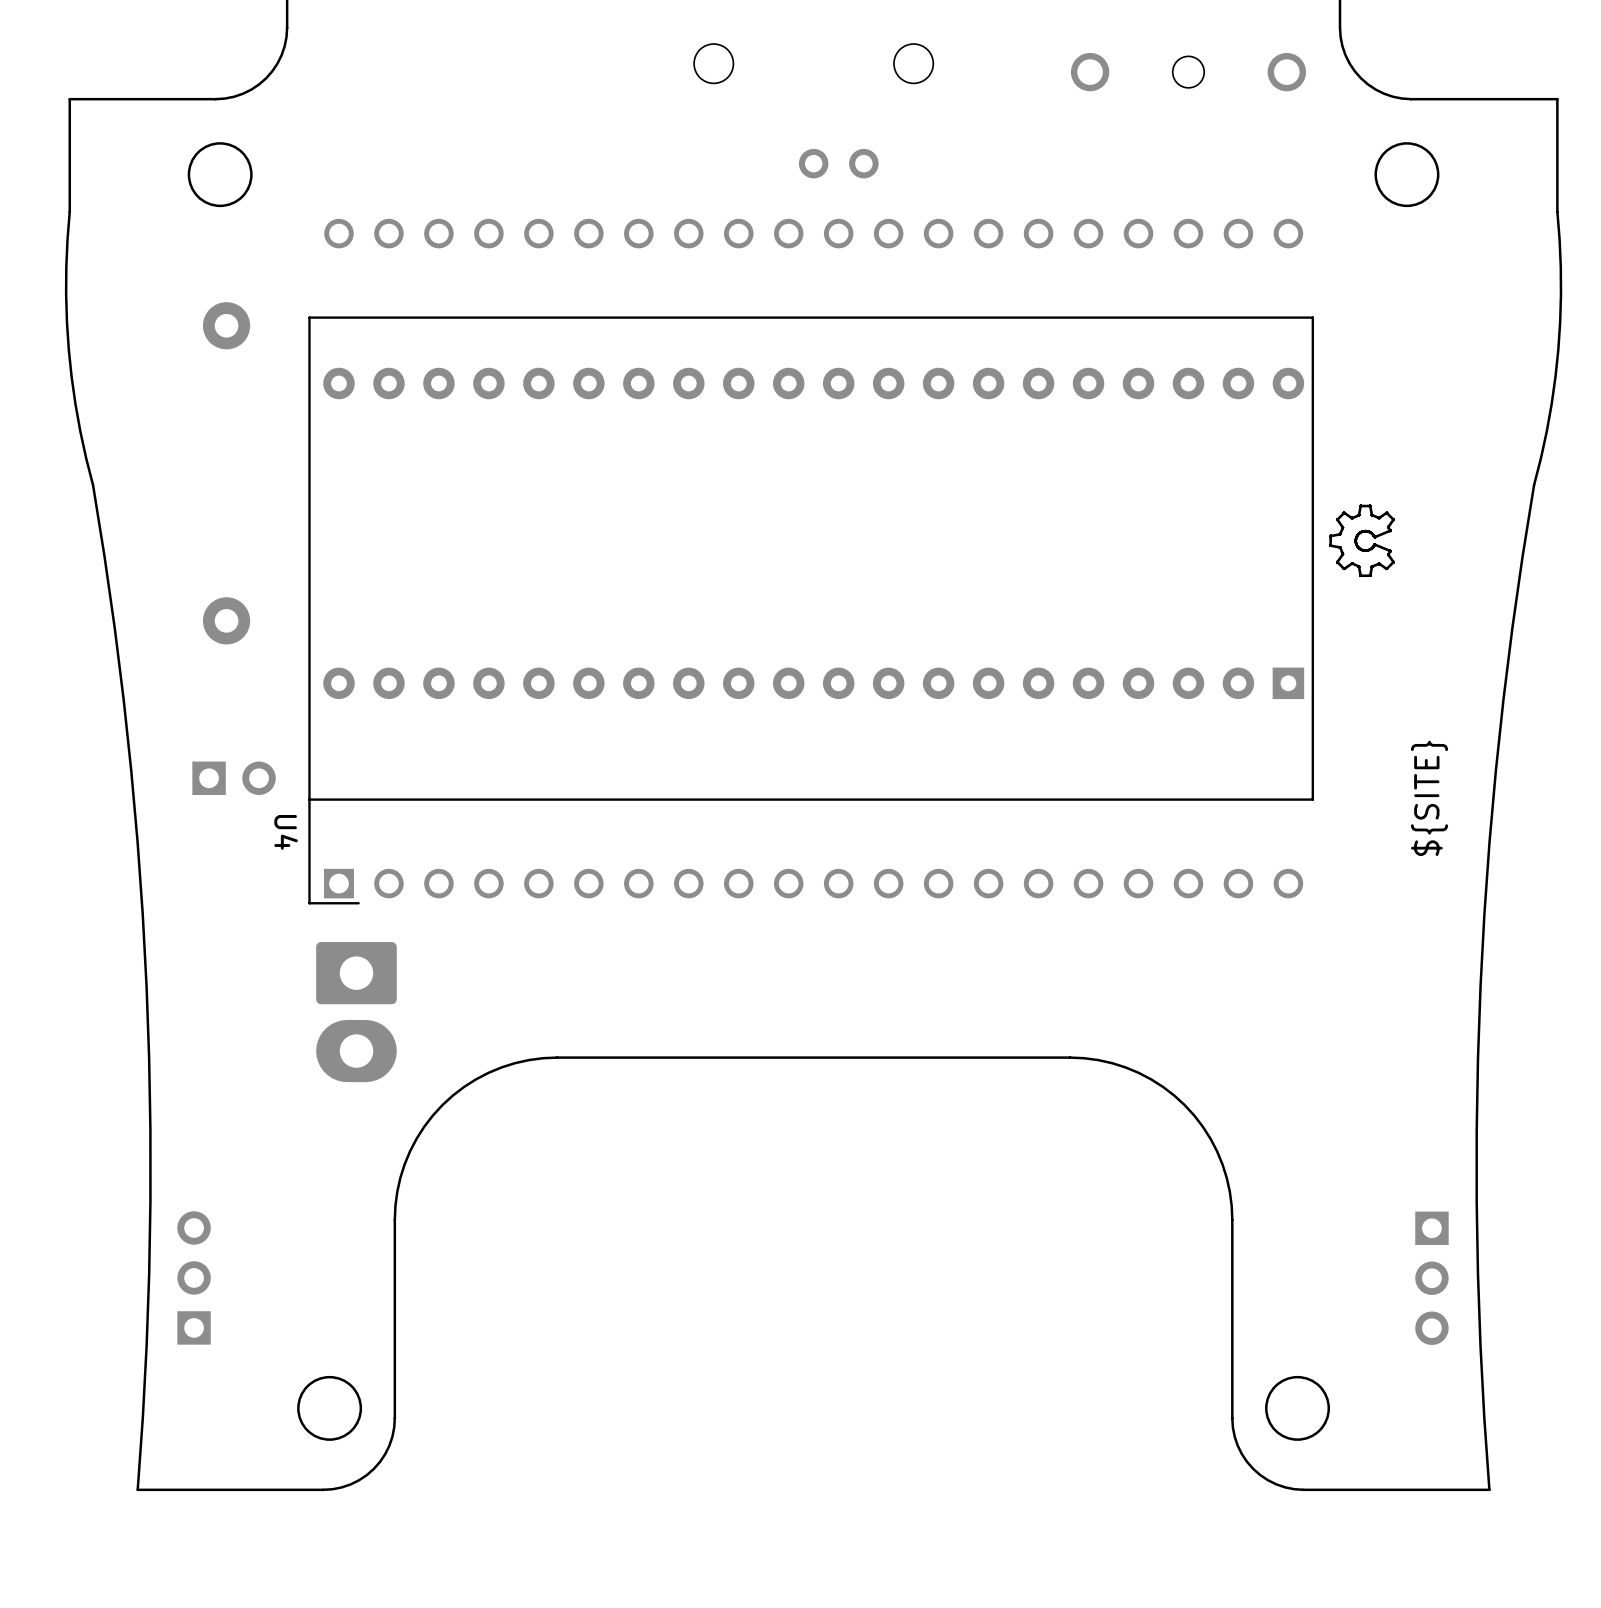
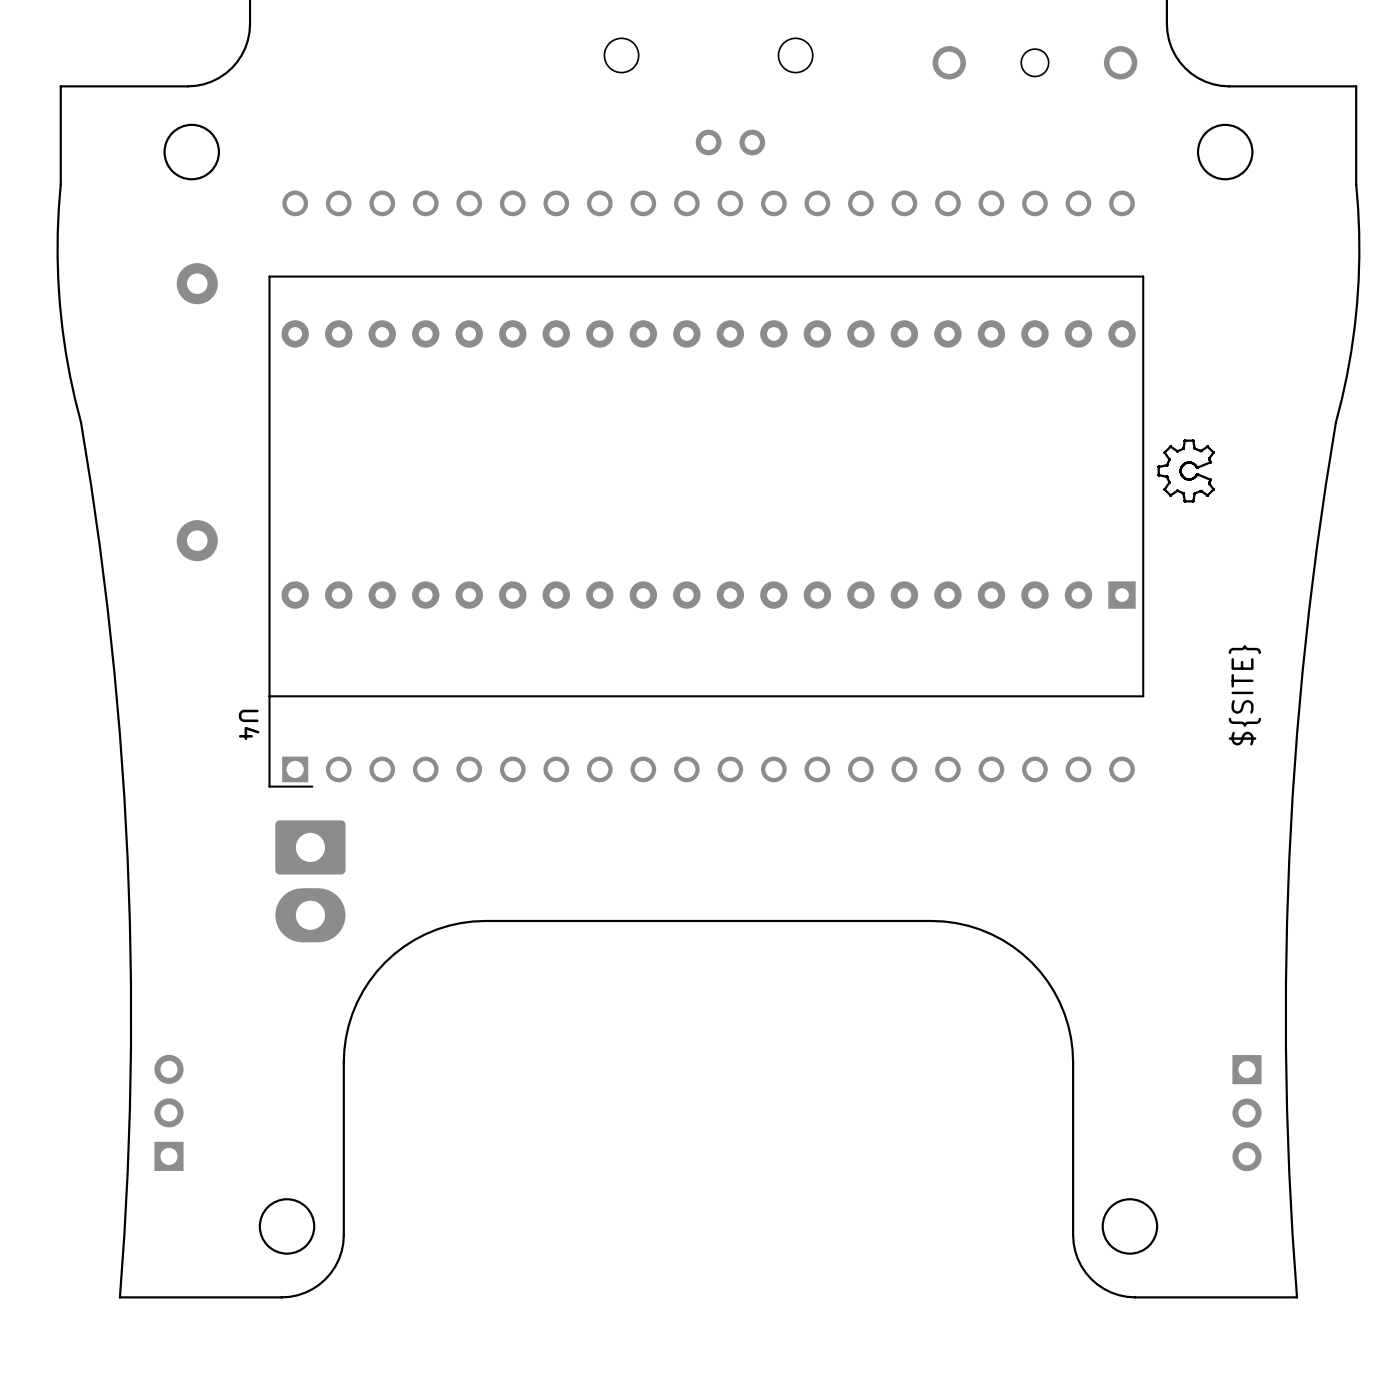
part: (234, 778) -> none

